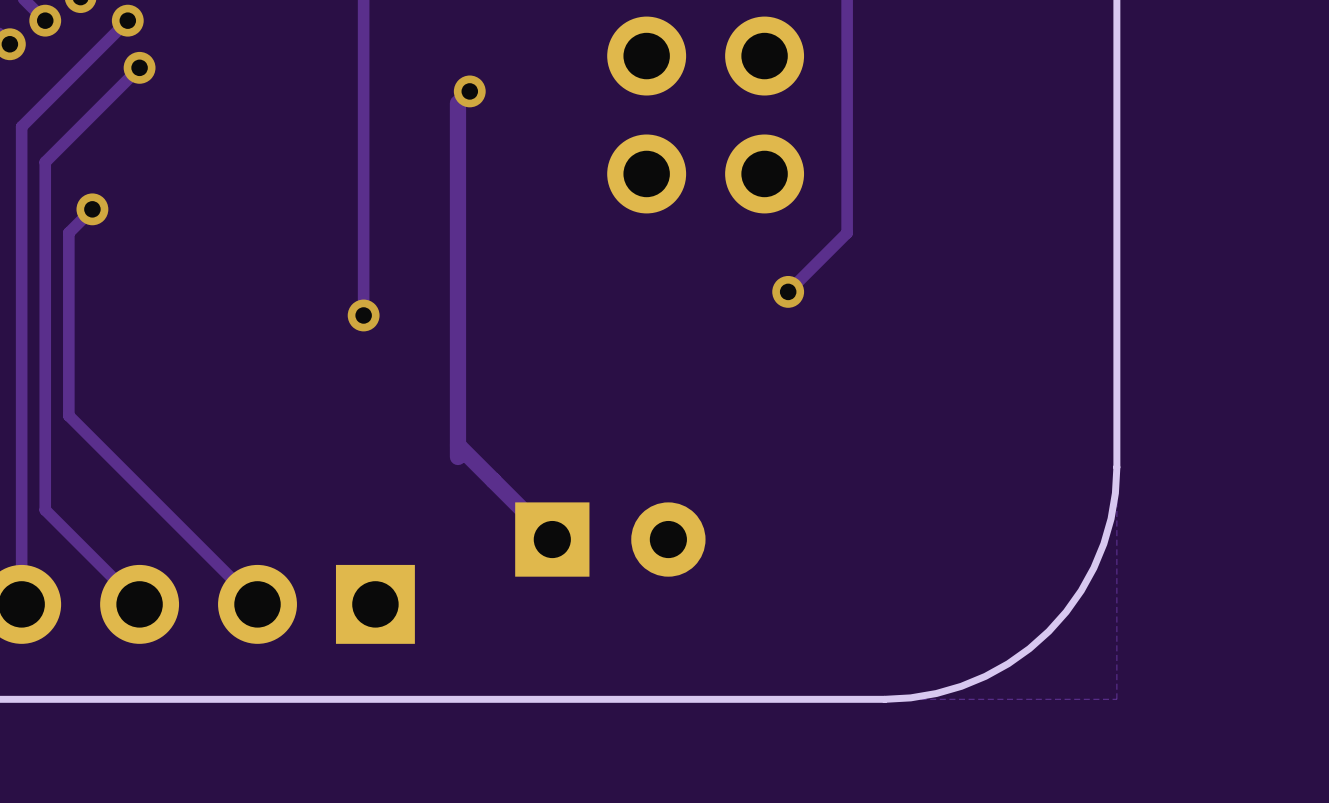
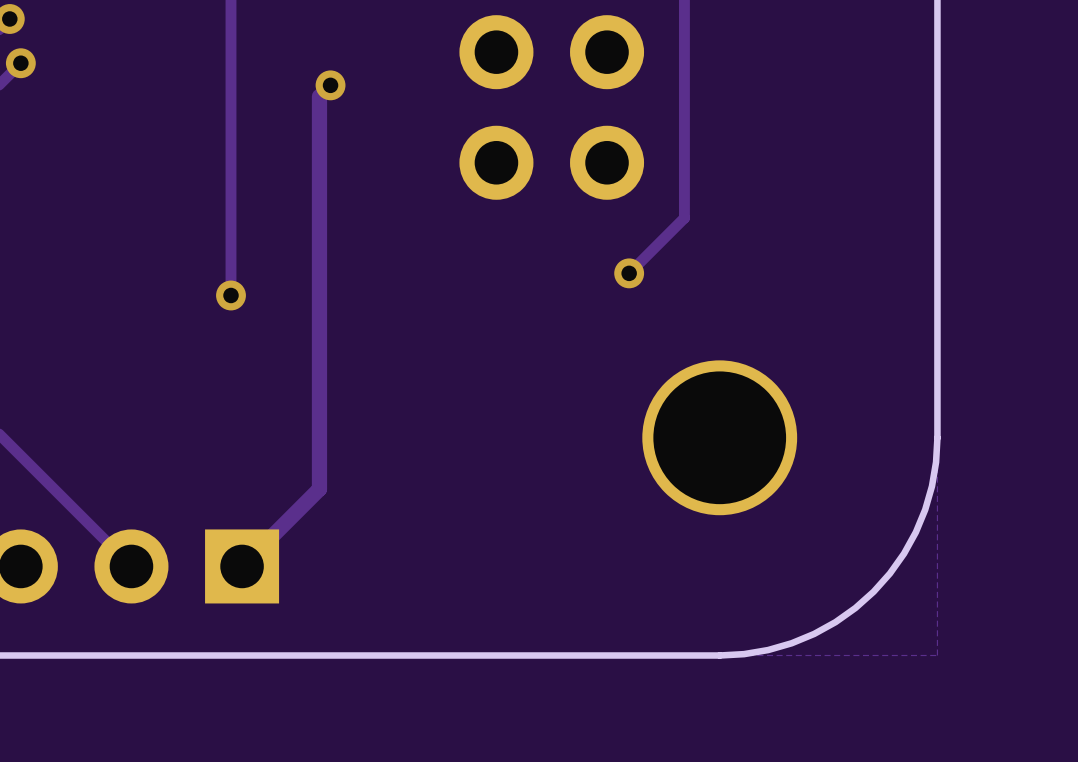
track: (457, 445) (552, 539) -> none
track: none -> (319, 428) (319, 489) (242, 566)
part: none -> (719, 437)
part: (610, 539) -> none

